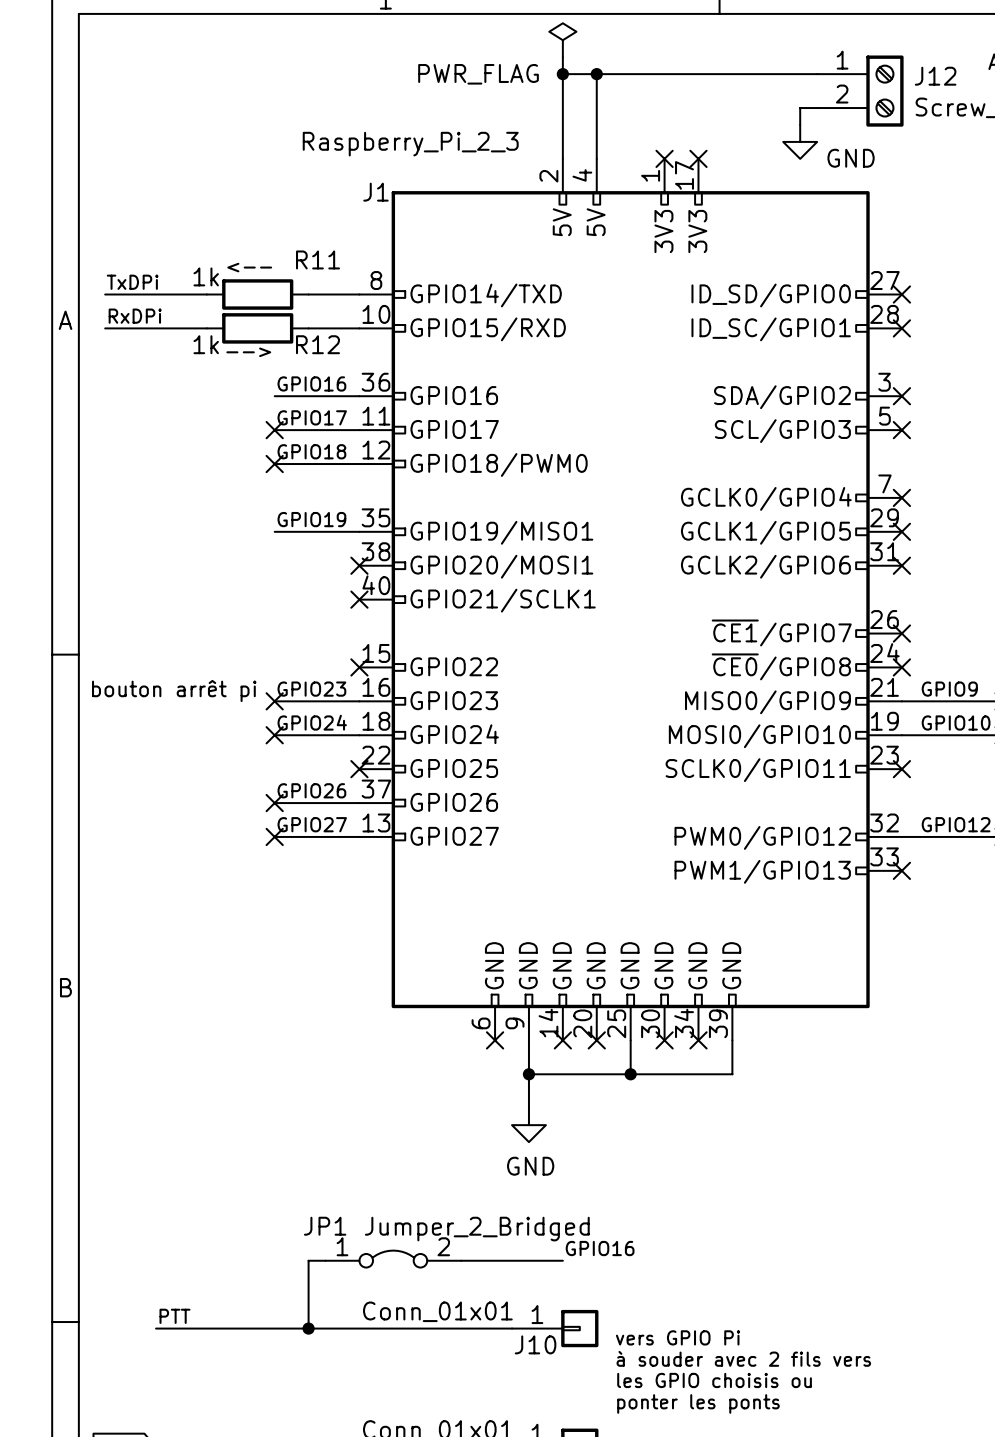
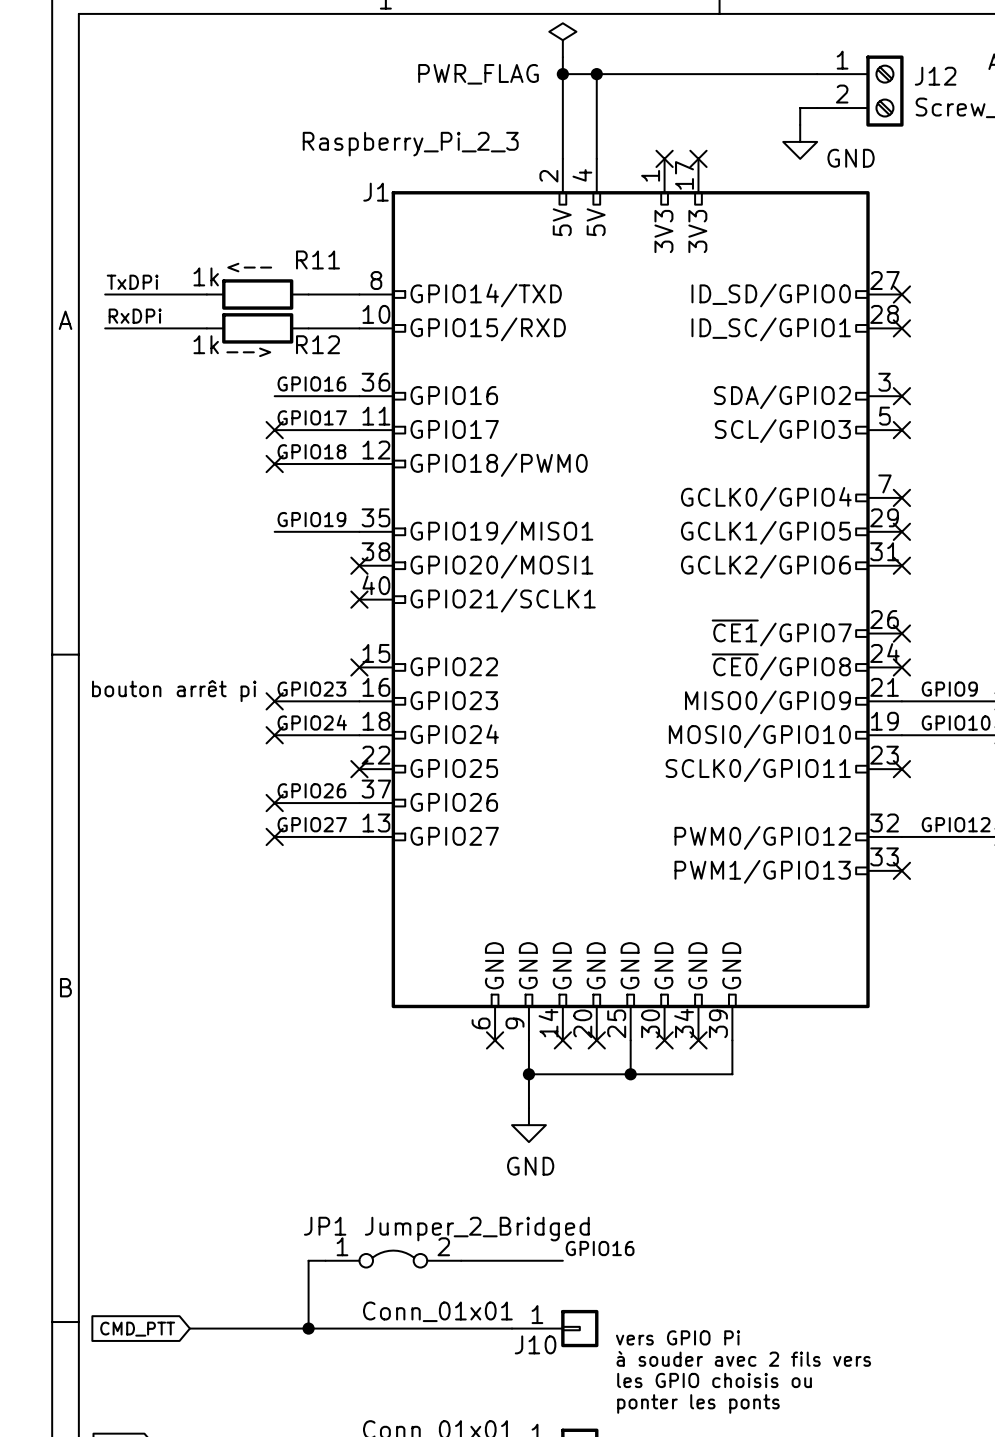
label: PTT (174, 1316) -> none
wire: (156, 1328) (189, 1328) -> none
global label: none -> CMD_PTT (137, 1329)

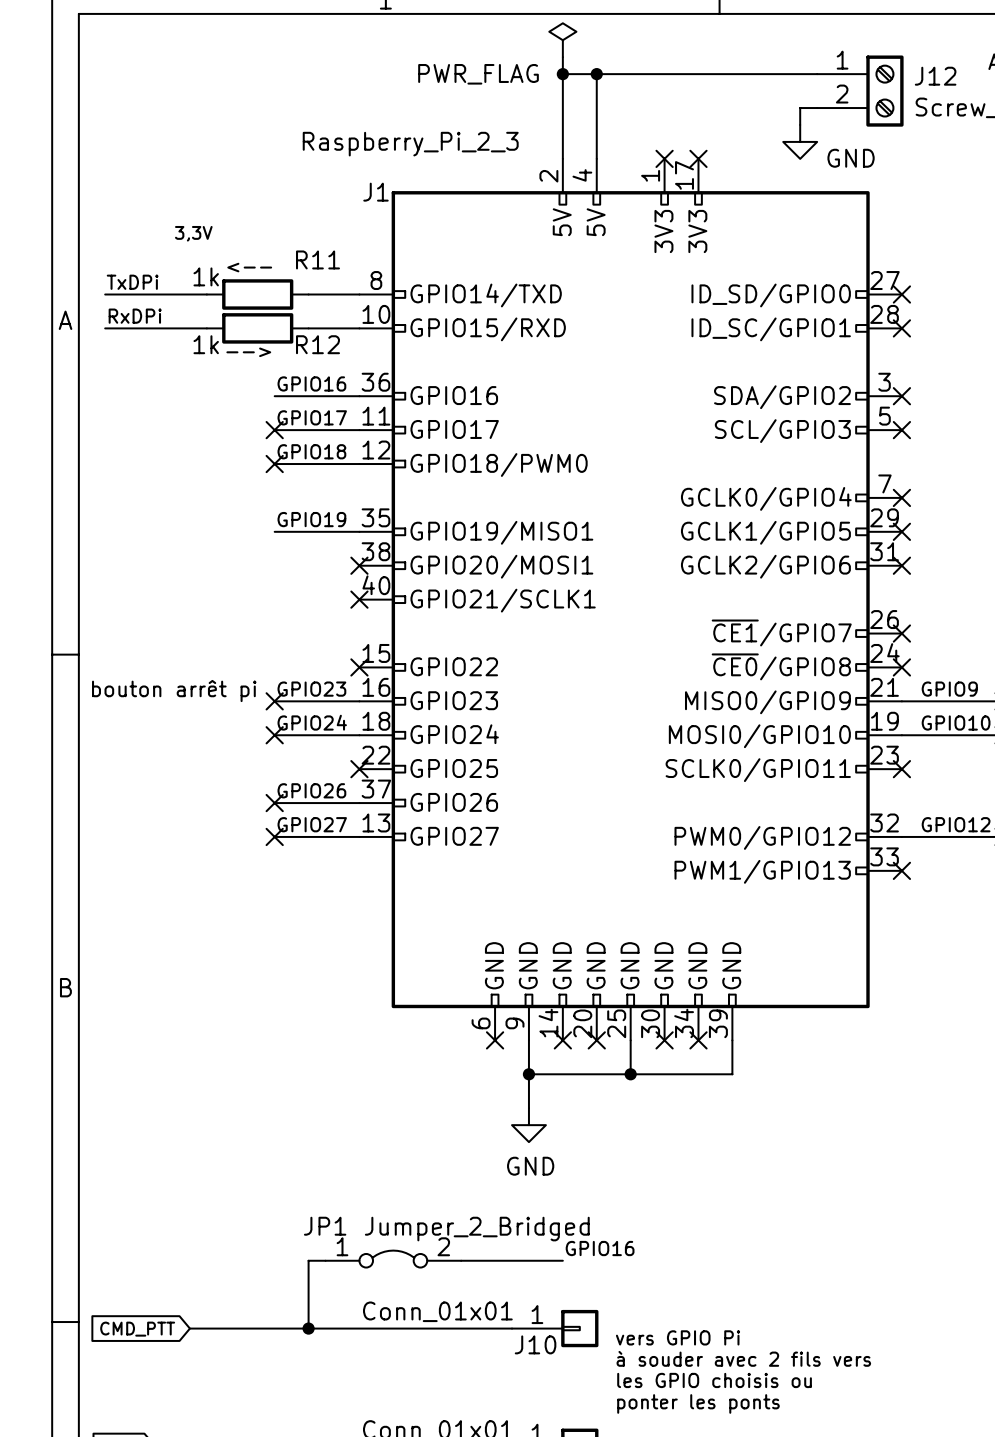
text: none -> 3,3V (193, 233)

